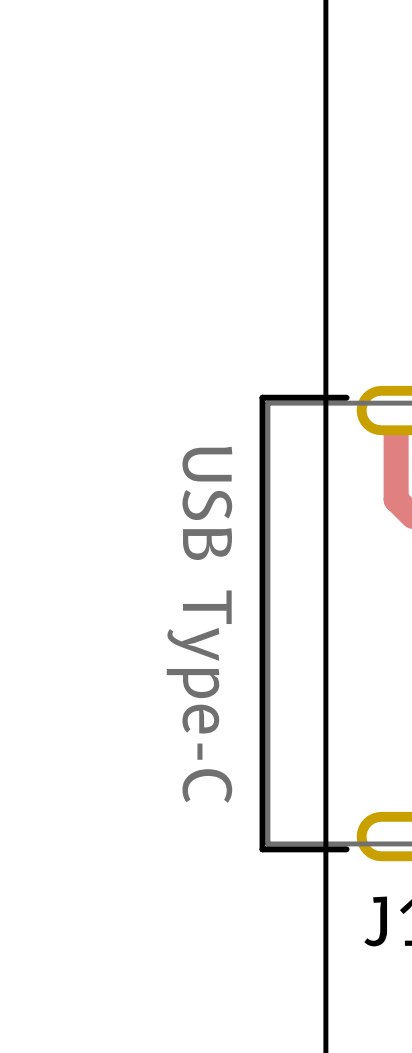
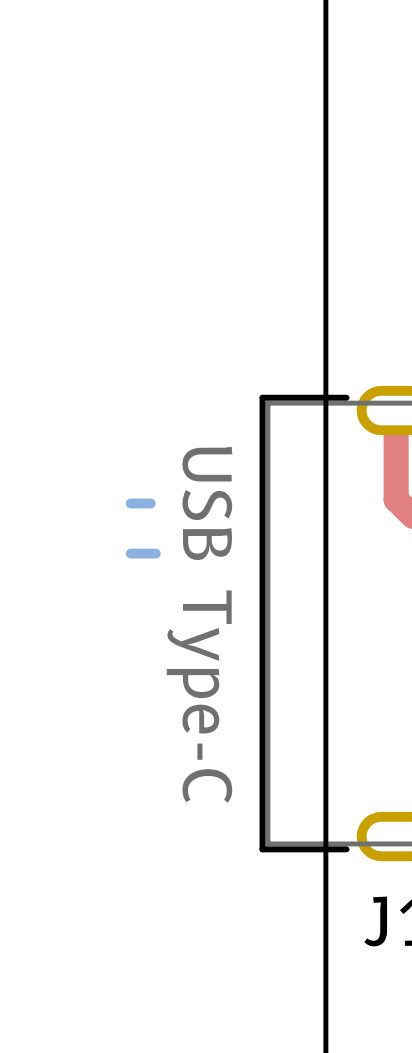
bottom track: none -> (150, 503) (130, 503)
bottom track: none -> (155, 553) (130, 553)

